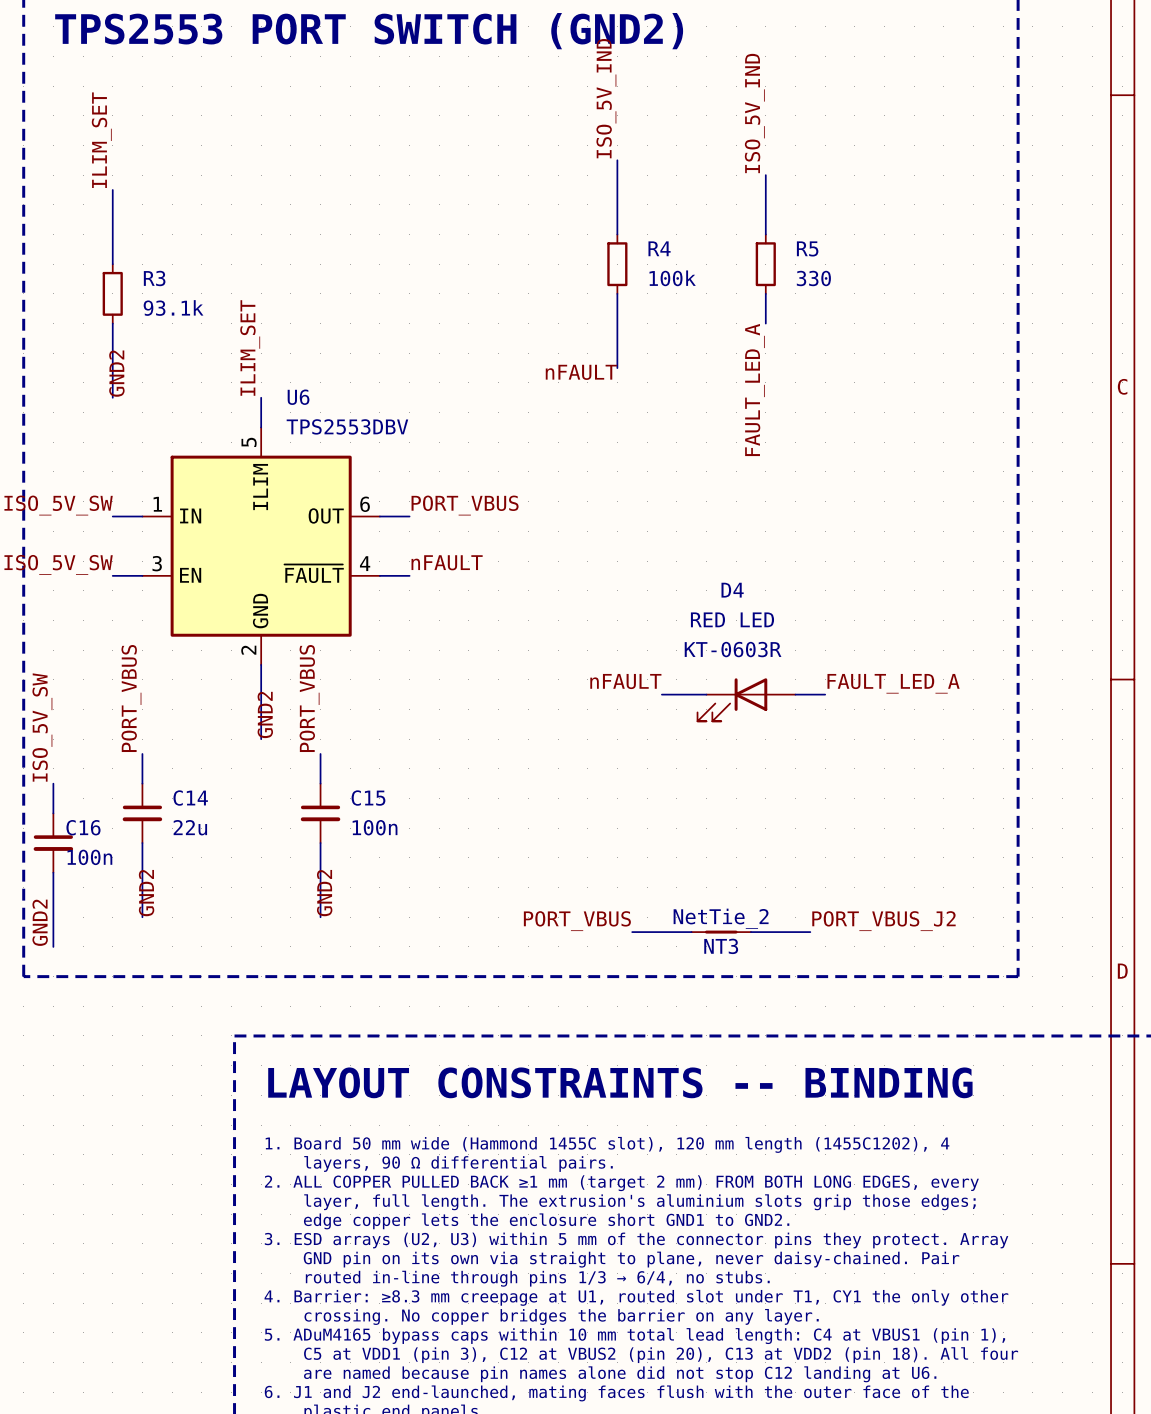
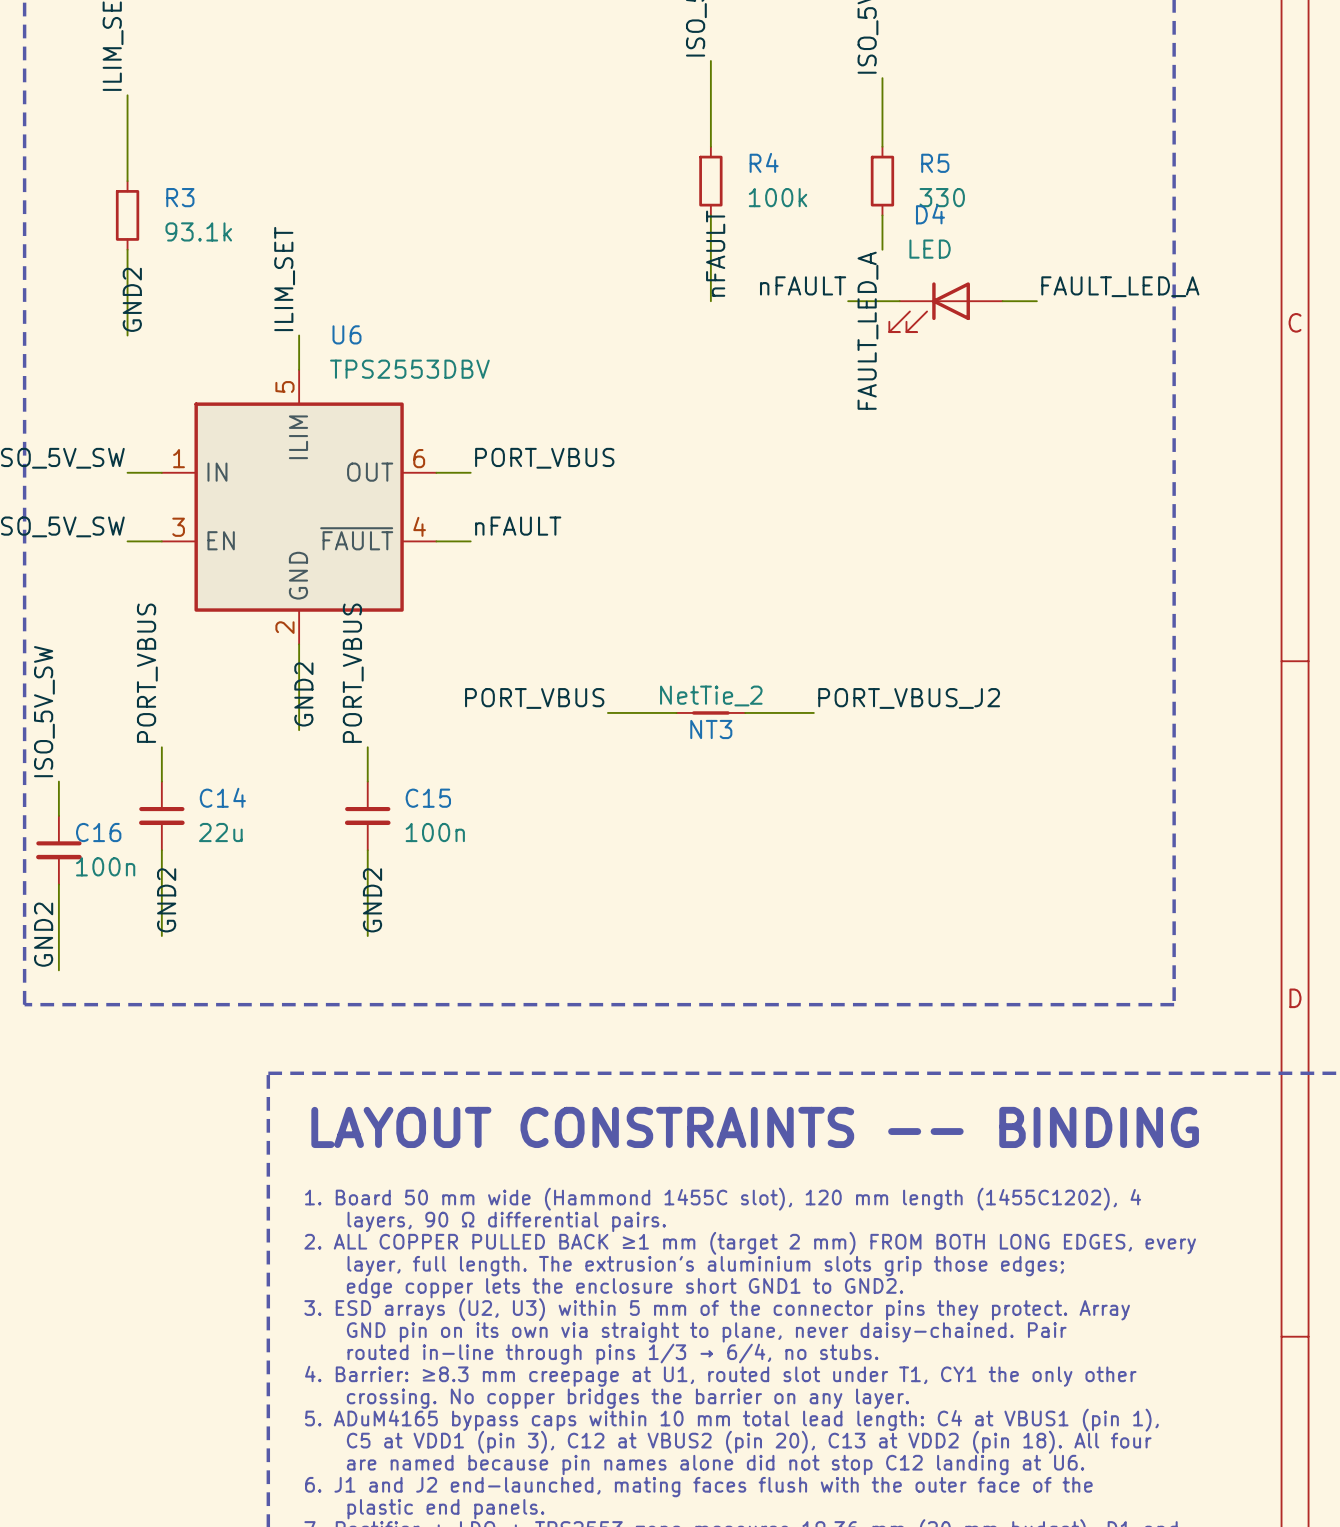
label: none -> nFAULT (803, 285)
label: none -> FAULT_LED_A (1120, 286)
wire: none -> (848, 301) (899, 301)
wire: none -> (1002, 301) (1036, 301)
label rotation: 0° (581, 372) -> 90° counterclockwise (715, 253)
D4 name position: D4 (732, 590) -> D4 (930, 214)
D4 value: RED LED (732, 619) -> LED (930, 249)
D4 text: KT-0603R (733, 649) -> none
label: nFAULT (625, 681) -> none
label: FAULT_LED_A (893, 683) -> none
wire: (661, 694) (706, 694) -> none
wire: (795, 694) (825, 694) -> none
D4 position: (746, 699) -> (945, 307)
label position: PORT_VBUS (577, 921) -> PORT_VBUS (534, 698)
label position: PORT_VBUS_J2 (883, 921) -> PORT_VBUS_J2 (909, 698)
wire: (632, 932) (691, 932) -> (607, 712) (676, 712)
NT3 position: (721, 932) -> (710, 712)
wire: (750, 932) (810, 932) -> (745, 712) (813, 712)

